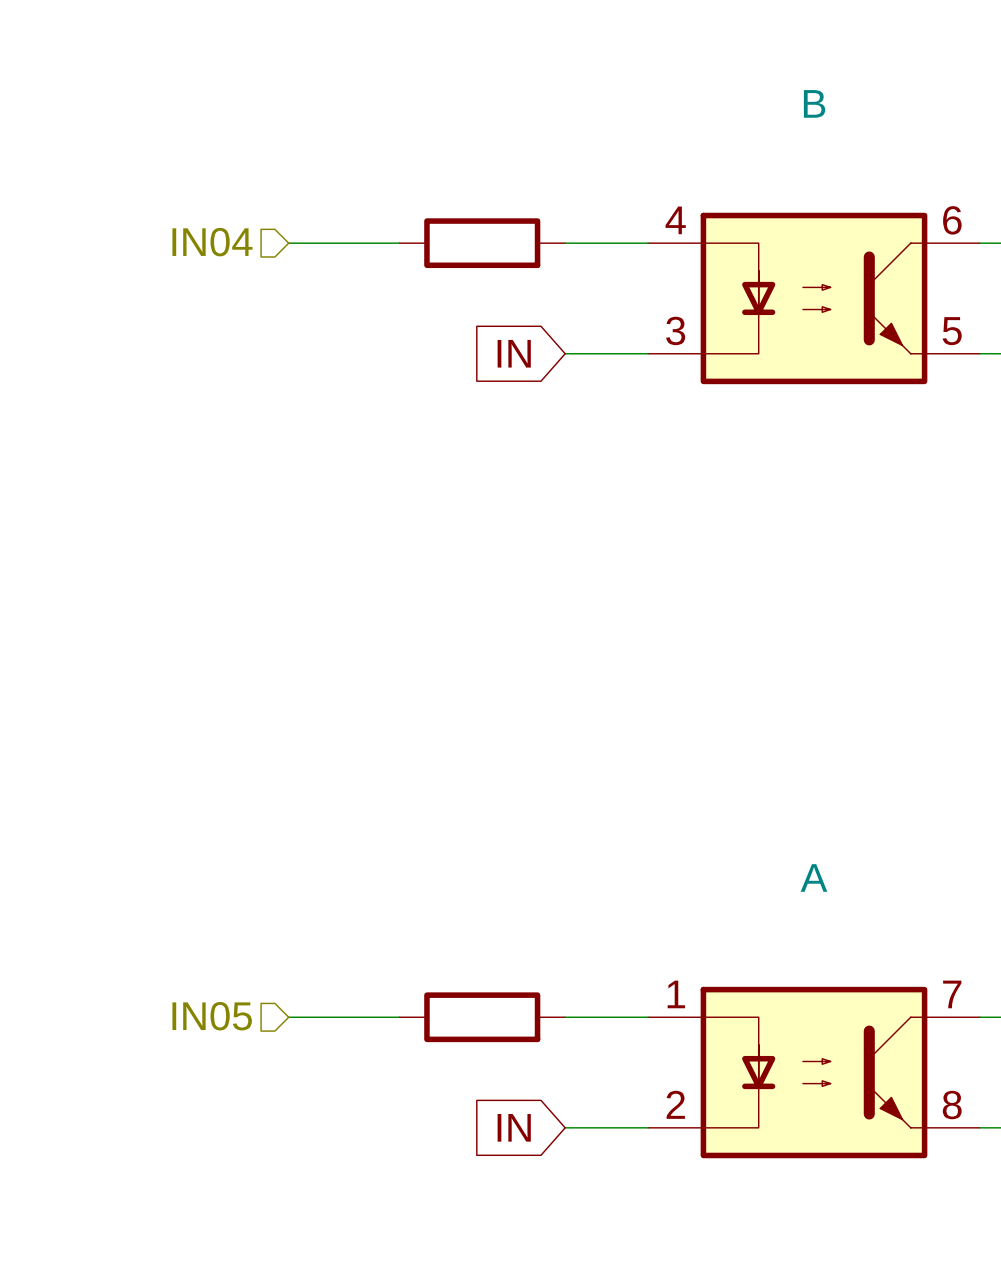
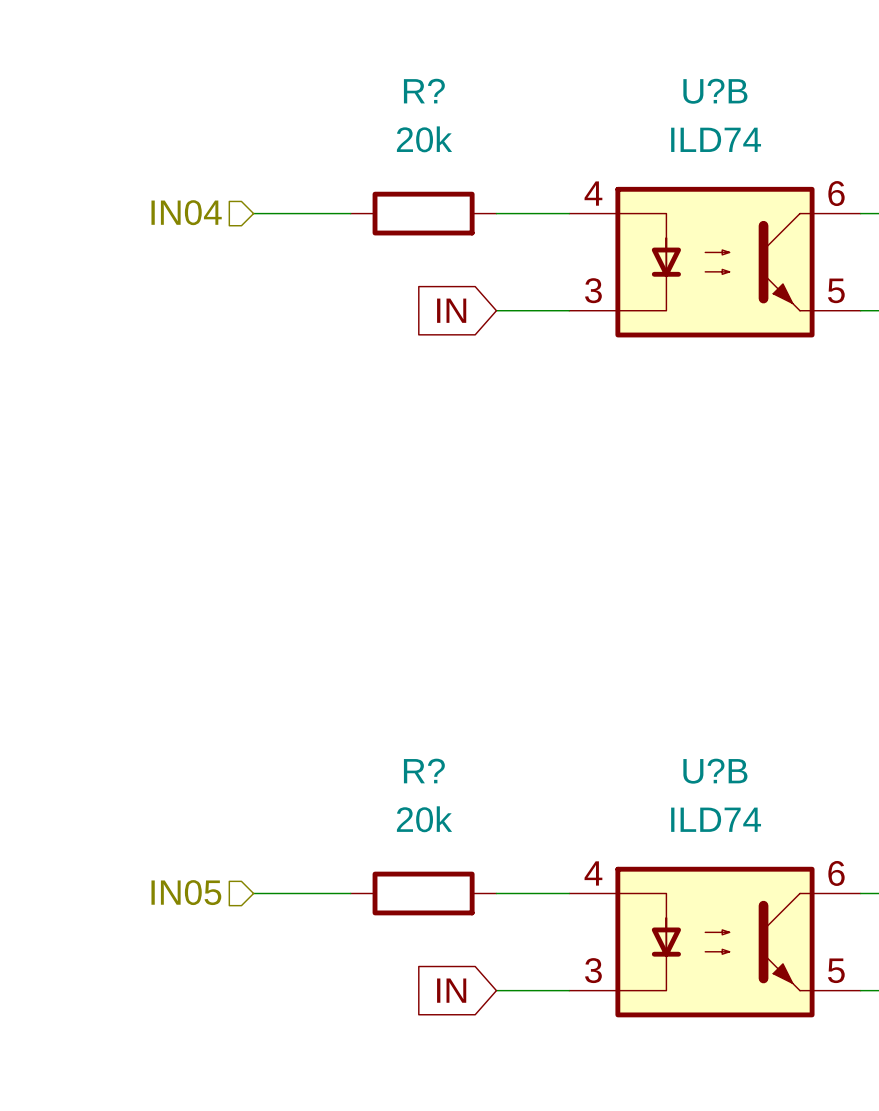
R? name: none -> R? (424, 91)
B name: B (814, 103) -> U?B (715, 91)
R? value: none -> 20k (424, 139)
B value: none -> ILD74 (716, 139)
R? name: none -> R? (424, 771)
A name: A (813, 877) -> U?B (715, 771)
R? value: none -> 20k (424, 819)
A value: none -> ILD74 (716, 819)
A pin number: 1 (676, 994) -> 4 (593, 873)
A pin number: 7 (952, 994) -> 6 (836, 873)
A pin number: 2 (675, 1104) -> 3 (593, 970)
A pin number: 8 (952, 1105) -> 5 (836, 970)

